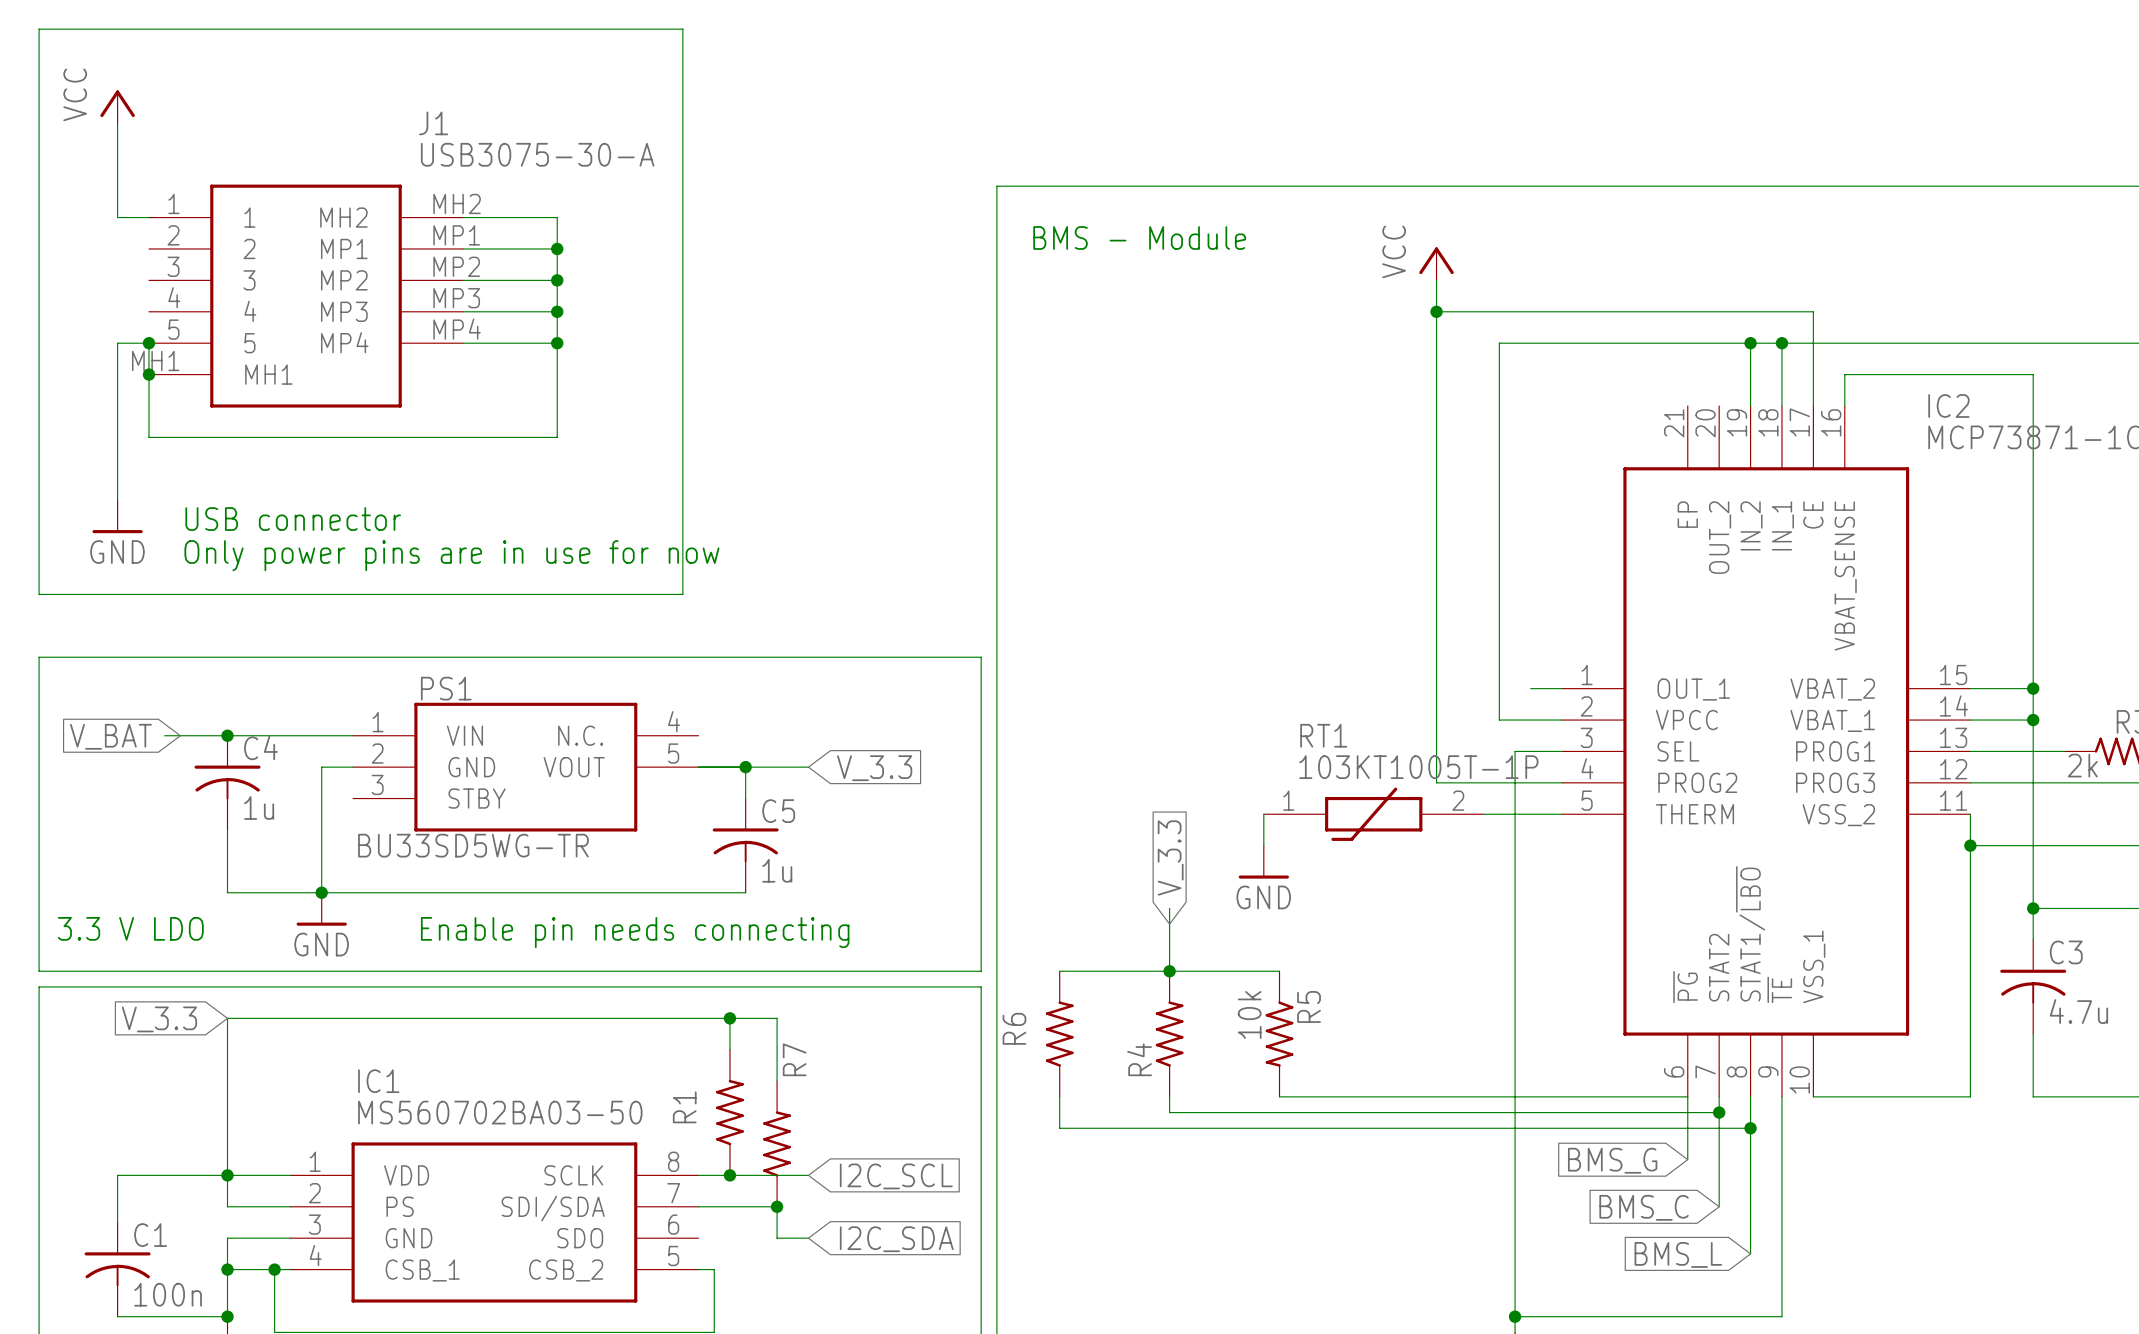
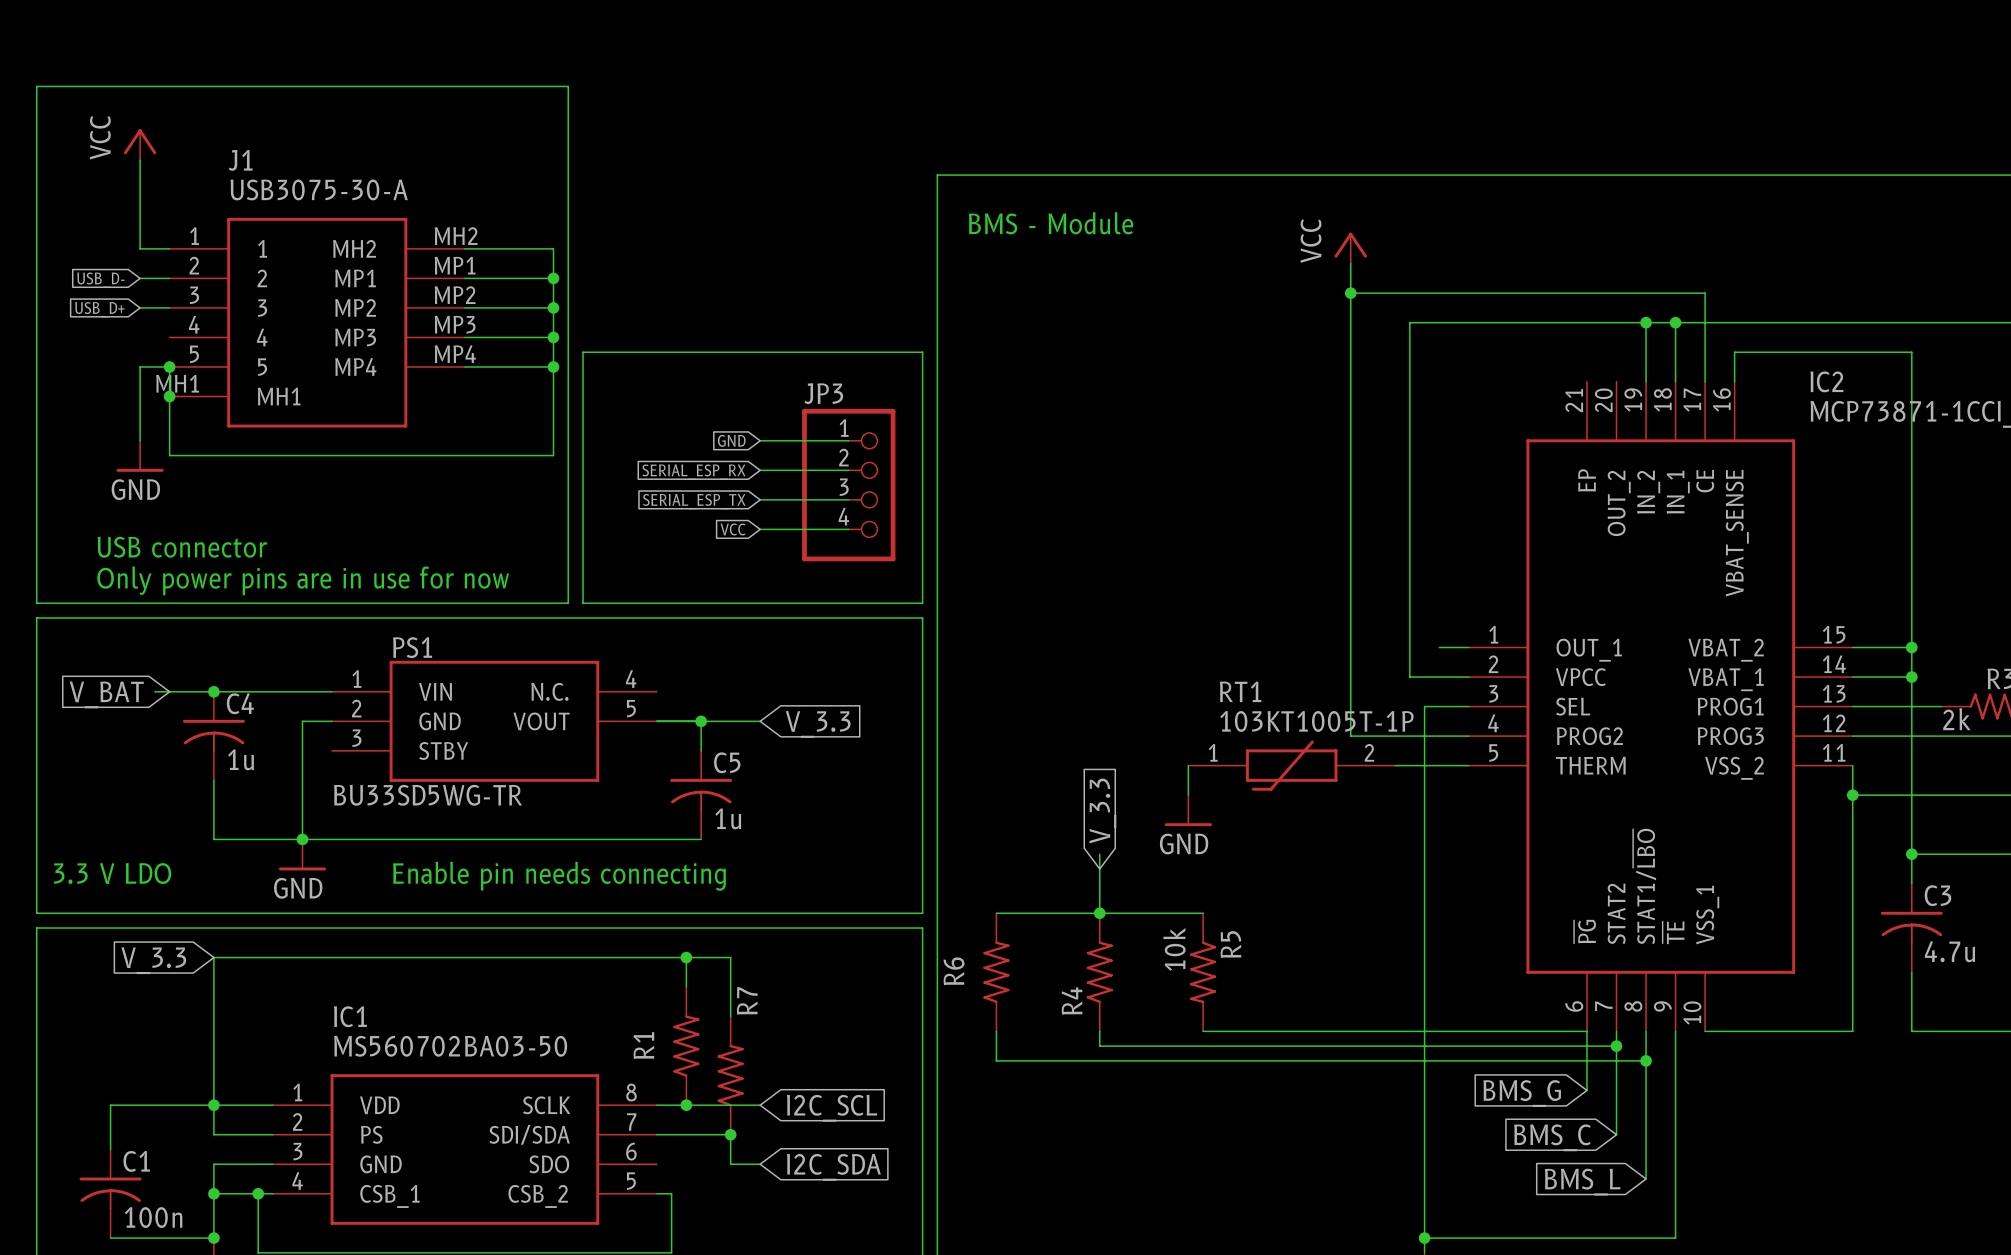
wire: (39, 91) (39, 29) (682, 29) (682, 594) (39, 594) -> (36, 86) (568, 86) (568, 603) (36, 603) (36, 558)
power symbol position: VCC (117, 106) -> VCC (140, 144)
wire: (117, 123) (117, 217) (148, 217) -> (140, 160) (140, 248) (169, 248)
J1 name position: J1 (433, 123) -> J1 (240, 160)
J1 value position: USB3075-30-A (537, 154) -> USB3075-30-A (319, 189)
wire: (463, 217) (557, 217) (557, 437) (148, 437) -> (140, 440) (140, 411)
wire: (463, 248) (557, 248) -> (464, 278) (553, 278)
junction: (557, 248) -> none
wire: (463, 280) (557, 280) -> (464, 307) (553, 307)
junction: (557, 280) -> none
global label: none -> USB_D- (100, 280)
wire: none -> (140, 278) (169, 278)
J1 position: (306, 296) -> (317, 322)
junction: none -> (553, 278)
wire: (463, 311) (557, 311) -> (464, 337) (553, 337)
junction: (557, 311) -> none
wire: none -> (140, 307) (169, 307)
junction: none -> (553, 307)
global label: none -> USB_D+ (99, 309)
junction: (148, 343) -> none
wire: (463, 343) (557, 343) -> (464, 366) (553, 366)
junction: (557, 343) -> none
junction: none -> (553, 337)
junction: (148, 374) -> none
wire: none -> (583, 352) (922, 352) (922, 603) (583, 603) (583, 352)
wire: (148, 390) (148, 343) (117, 343) (117, 500) -> (140, 366) (169, 366) (169, 455) (553, 455) (553, 248) (464, 248)
junction: none -> (169, 366)
junction: none -> (553, 366)
junction: none -> (169, 396)
global label: none -> GND (731, 440)
wire: none -> (760, 440) (848, 440)
global label: none -> SERIAL_ESP_RX (693, 472)
wire: none -> (760, 470) (848, 470)
JP3: none -> (848, 485)
power symbol position: GND (117, 516) -> GND (140, 456)
text position: USB connector (293, 519) -> USB connector (182, 547)
wire: none -> (760, 499) (848, 499)
global label: none -> SERIAL_ESP_TX (694, 501)
text position: Only power pins are in use for now (451, 555) -> Only power pins are in use for now (303, 580)
global label: none -> VCC (733, 529)
wire: none -> (760, 529) (848, 529)

